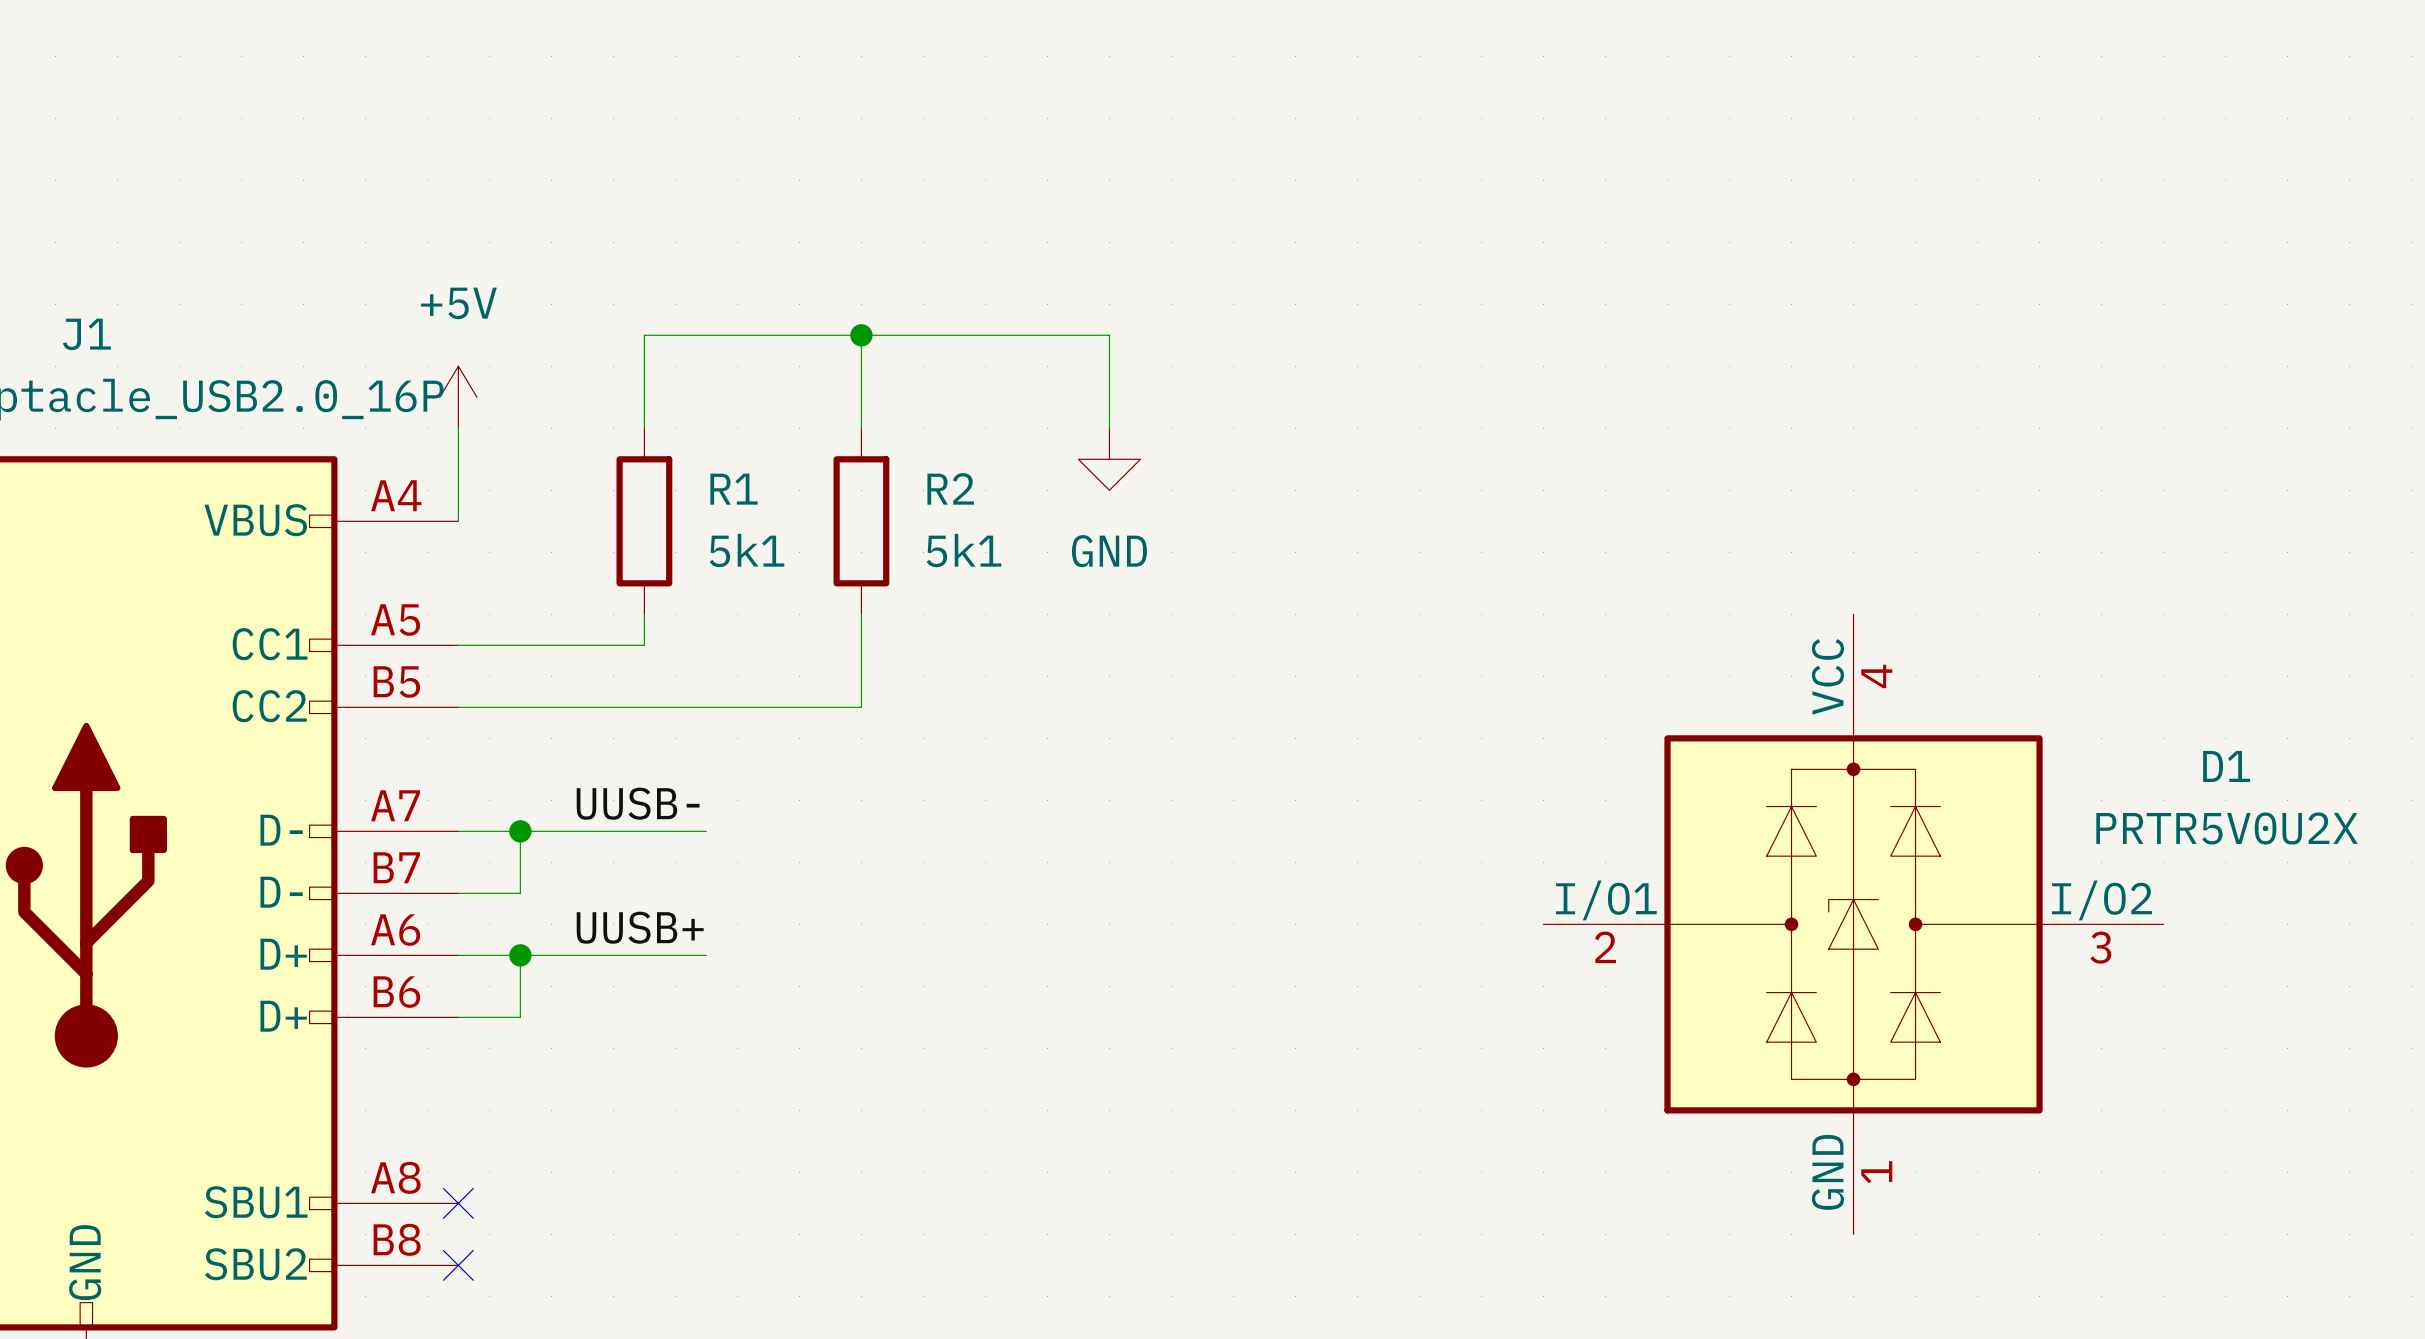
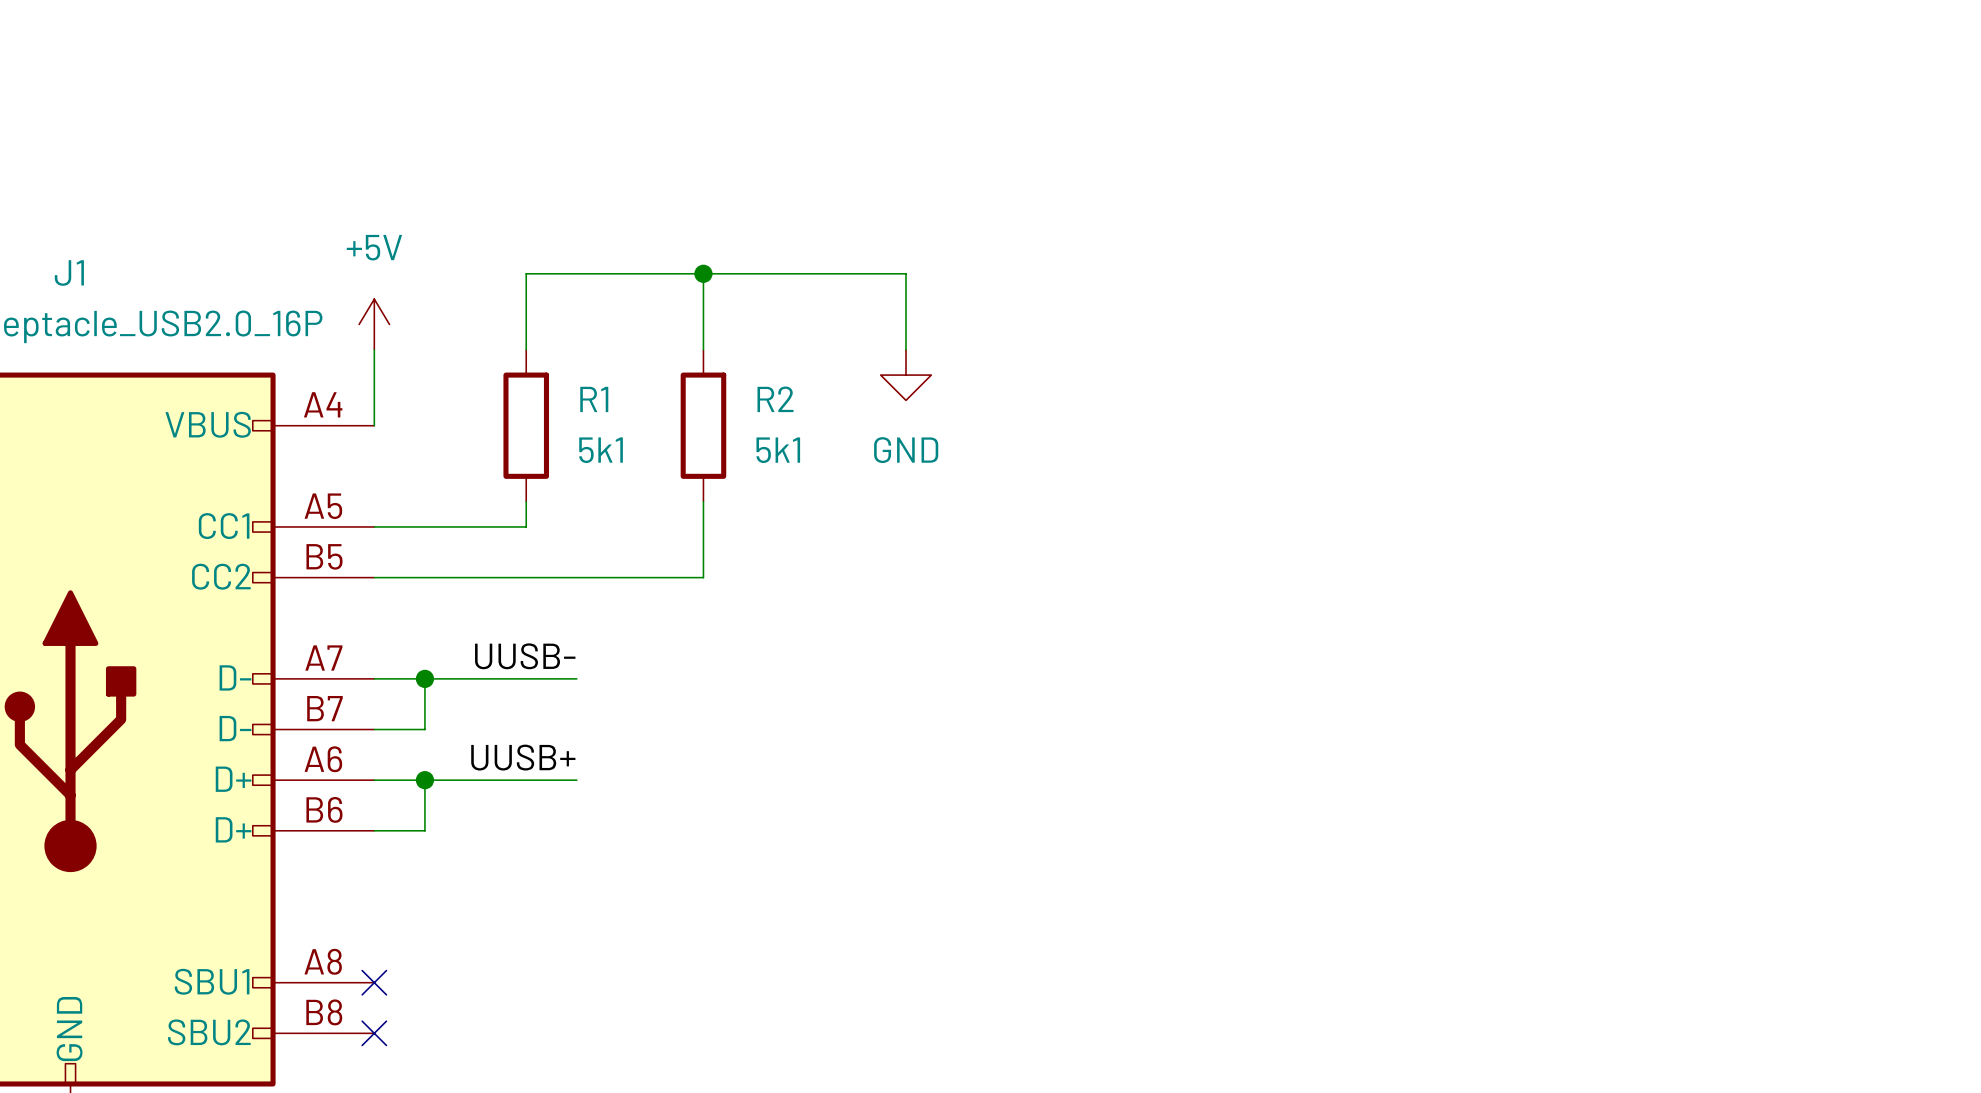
D1: PRTR5V0U2X (1853, 924) -> none

